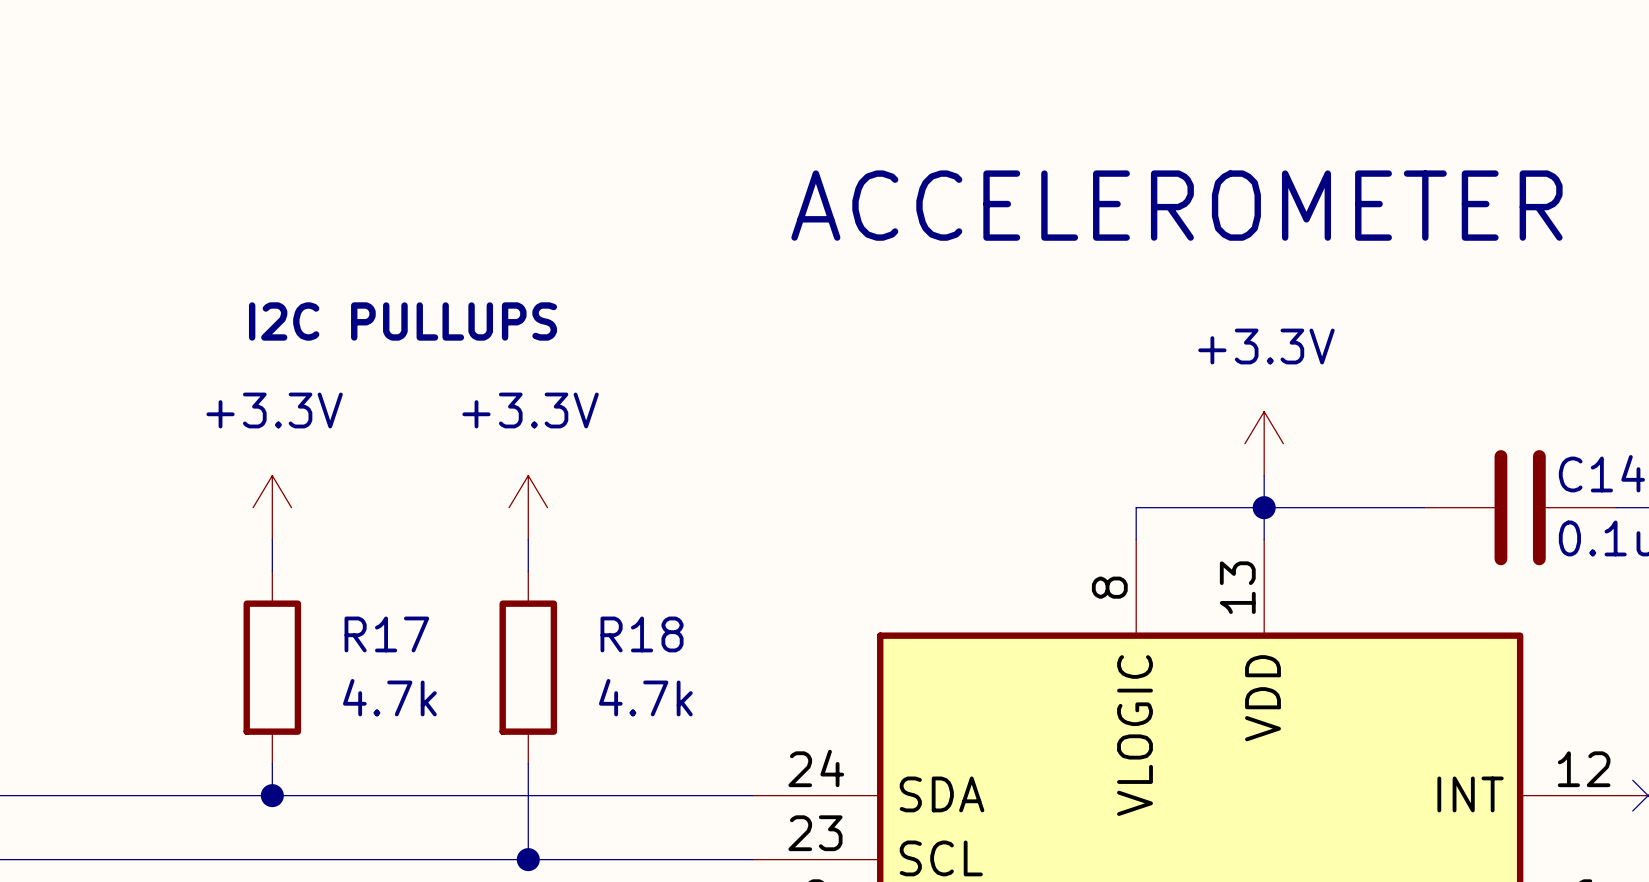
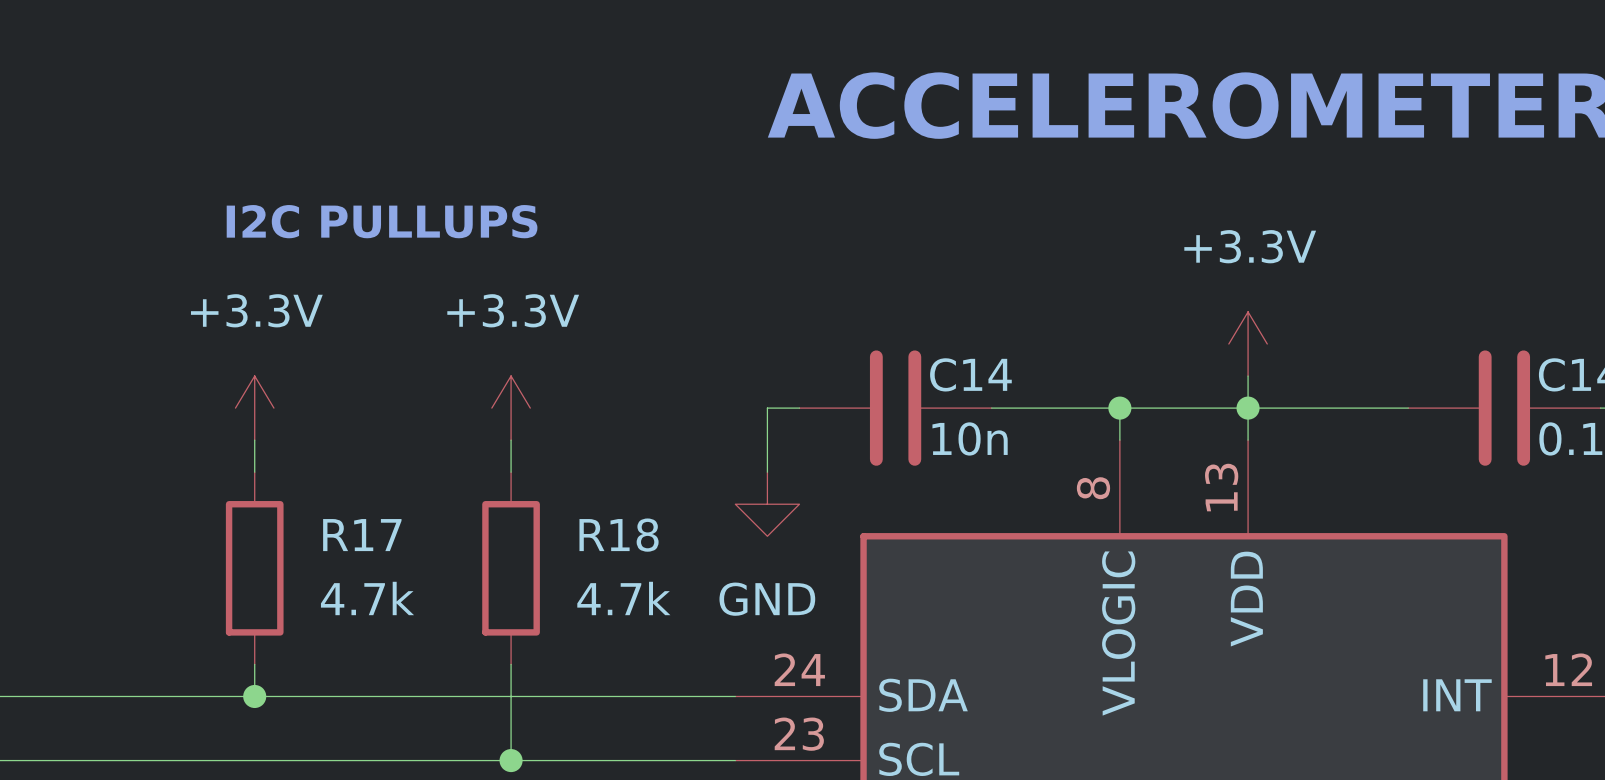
wire: none -> (799, 408) (767, 408) (767, 472)
C14: none -> 10n (895, 408)
wire: none -> (991, 408) (1119, 408)
junction: none -> (1119, 408)
power symbol: none -> GND (767, 504)

